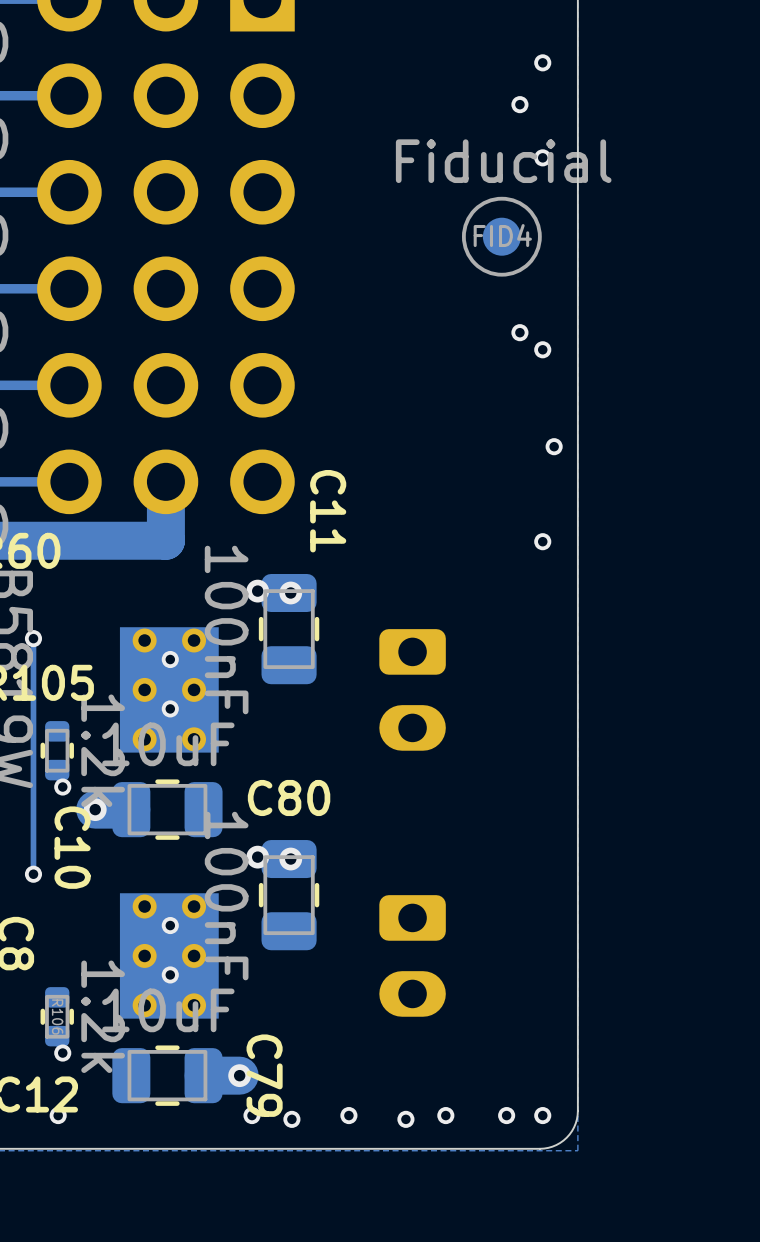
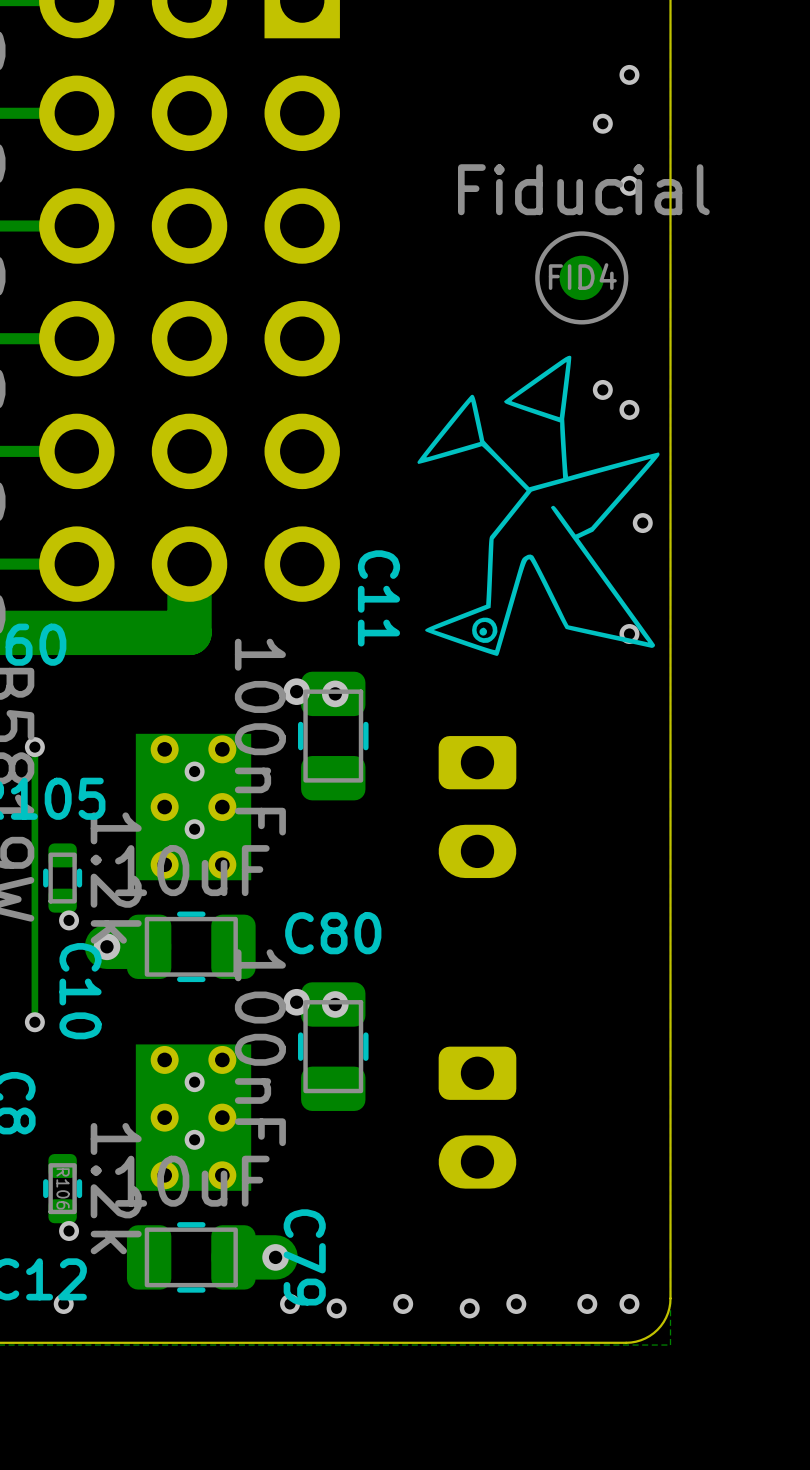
drawing: none -> [417, 355, 660, 656]

